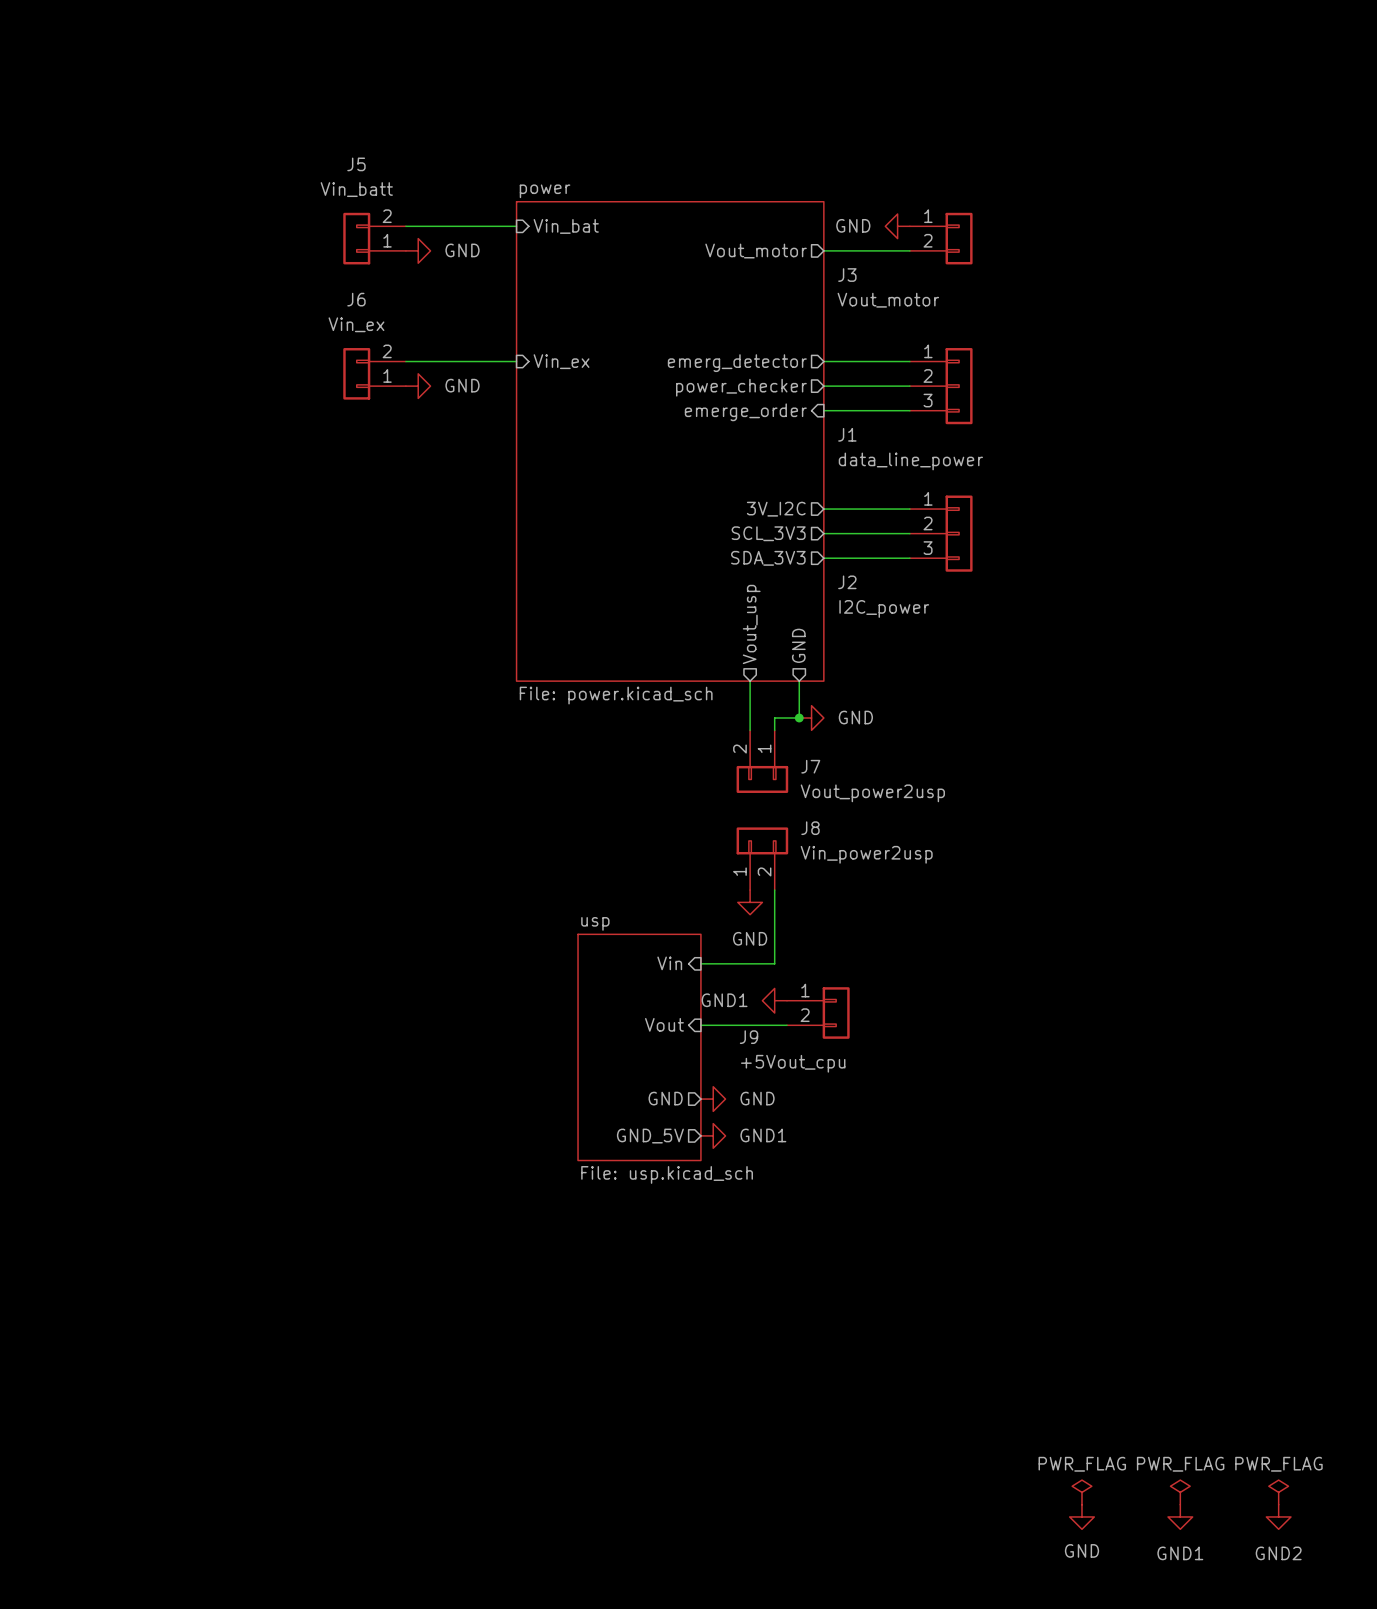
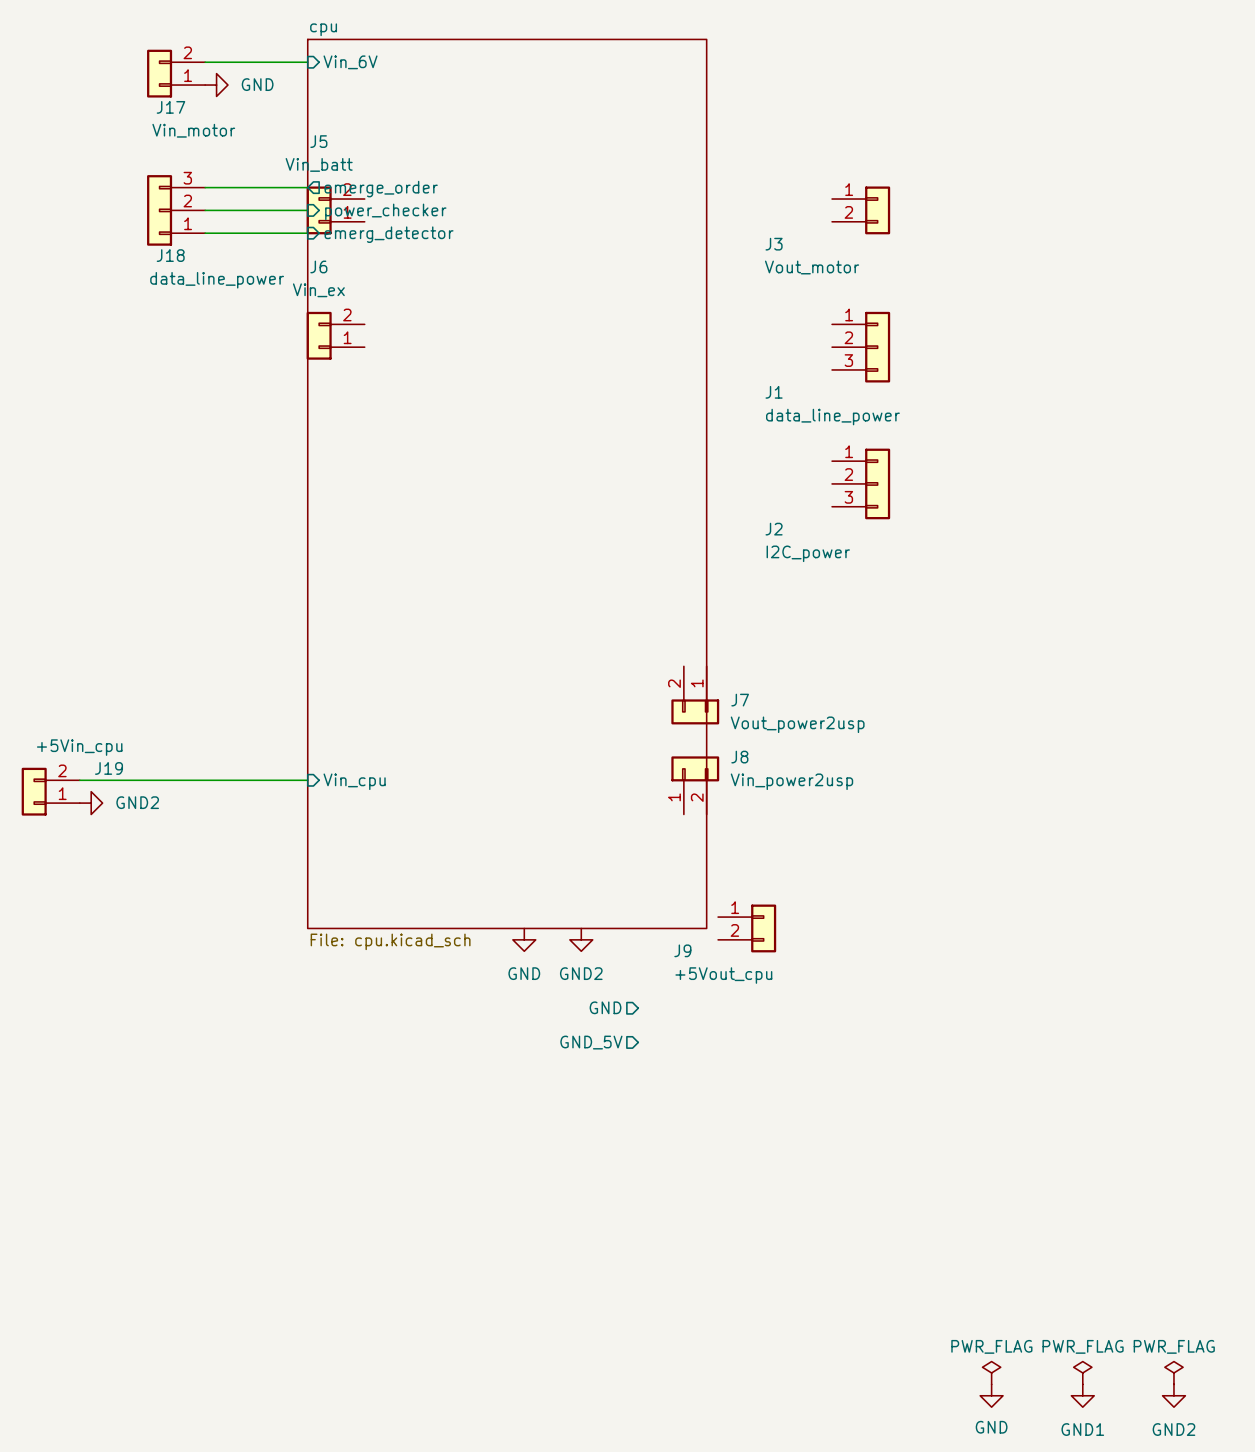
sheet pin: none -> Vin_6V (350, 62)
J17: none -> Vin_motor (176, 73)
power symbol: none -> GND (216, 85)
sheet pin: none -> emerge_order (381, 189)
wire: (405, 226) (516, 226) -> (205, 62) (307, 62)
sheet pin: Vin_bat (566, 226) -> none
power symbol: GND (897, 226) -> none
J18: none -> data_line_power (176, 210)
wire: none -> (205, 210) (307, 210)
sheet pin: none -> power_checker (385, 211)
power symbol: GND (418, 250) -> none
wire: (823, 250) (909, 250) -> none
sheet pin: Vout_motor (756, 251) -> none
wire: none -> (205, 233) (307, 233)
sheet pin: none -> emerg_detector (389, 234)
wire: (405, 361) (516, 361) -> (205, 187) (307, 187)
sheet pin: Vin_ex (561, 361) -> none
wire: (823, 361) (909, 361) -> none
sheet pin: emerg_detector (737, 363) -> none
power symbol: GND (418, 386) -> none
wire: (823, 386) (909, 386) -> none
sheet pin: power_checker (741, 387) -> none
wire: (823, 410) (909, 410) -> none
sheet pin: emerge_order (745, 412) -> none
sheet power: File: power.kicad_sch (670, 441) -> none
sheet pin: 3V_I2C (776, 509) -> none
wire: (823, 509) (909, 509) -> none
sheet cpu: none -> File: cpu.kicad_sch (507, 483)
sheet pin: SCL_3V3 (768, 533) -> none
wire: (823, 533) (909, 533) -> none
sheet pin: SDA_3V3 (768, 558) -> none
wire: (823, 558) (909, 558) -> none
sheet pin: Vout_usp (751, 624) -> none
sheet pin: GND (798, 645) -> none
wire: (750, 681) (750, 730) -> none
wire: (799, 681) (799, 718) (774, 718) (774, 730) -> none
junction: (799, 718) -> none
power symbol: GND (811, 718) -> none
wire: none -> (79, 780) (307, 780)
sheet pin: none -> Vin_cpu (354, 781)
J19: none -> +5Vin_cpu (50, 791)
power symbol: none -> GND2 (91, 803)
wire: (774, 890) (774, 963) (700, 963) -> none
power symbol: GND (750, 902) -> none
sheet pin: Vin (669, 963) -> none
power symbol: GND1 (774, 1000) -> none
sheet pin: Vout (664, 1024) -> none
power symbol: none -> GND (524, 939)
power symbol: none -> GND2 (581, 939)
wire: (700, 1025) (786, 1025) -> none
sheet usp: File: usp.kicad_sch (639, 1047) -> none
power symbol: GND (713, 1099) -> none
power symbol: GND1 (713, 1135) -> none

